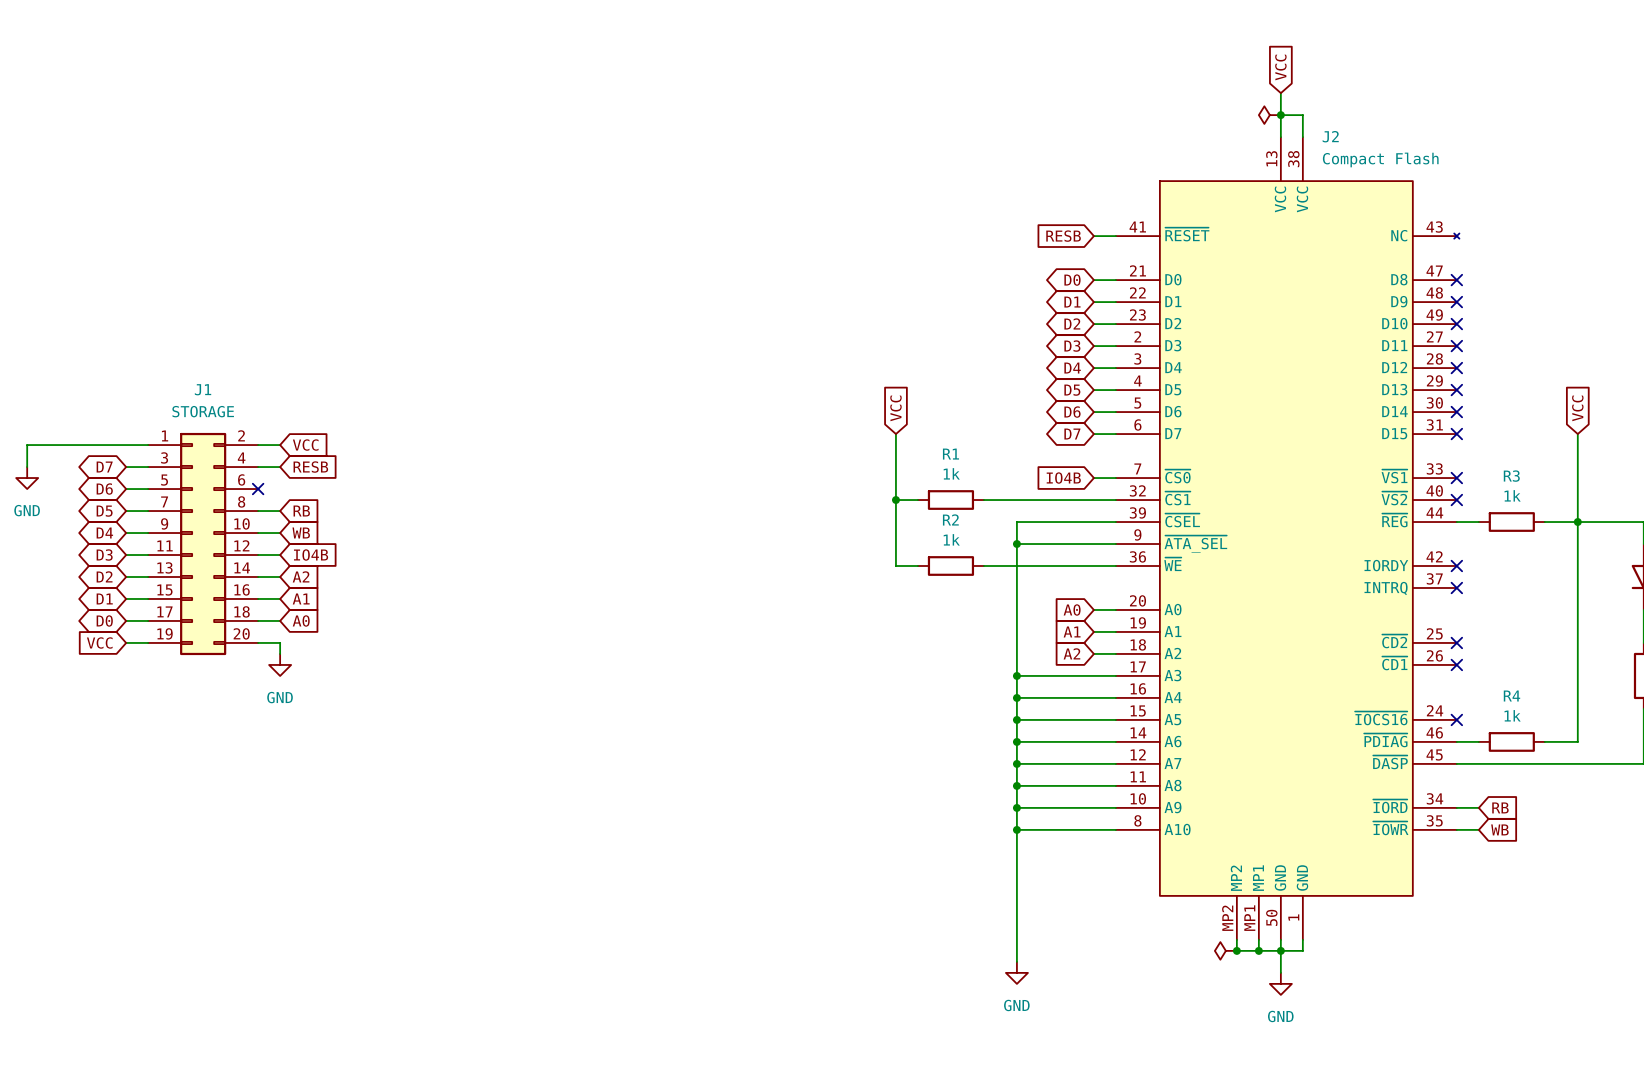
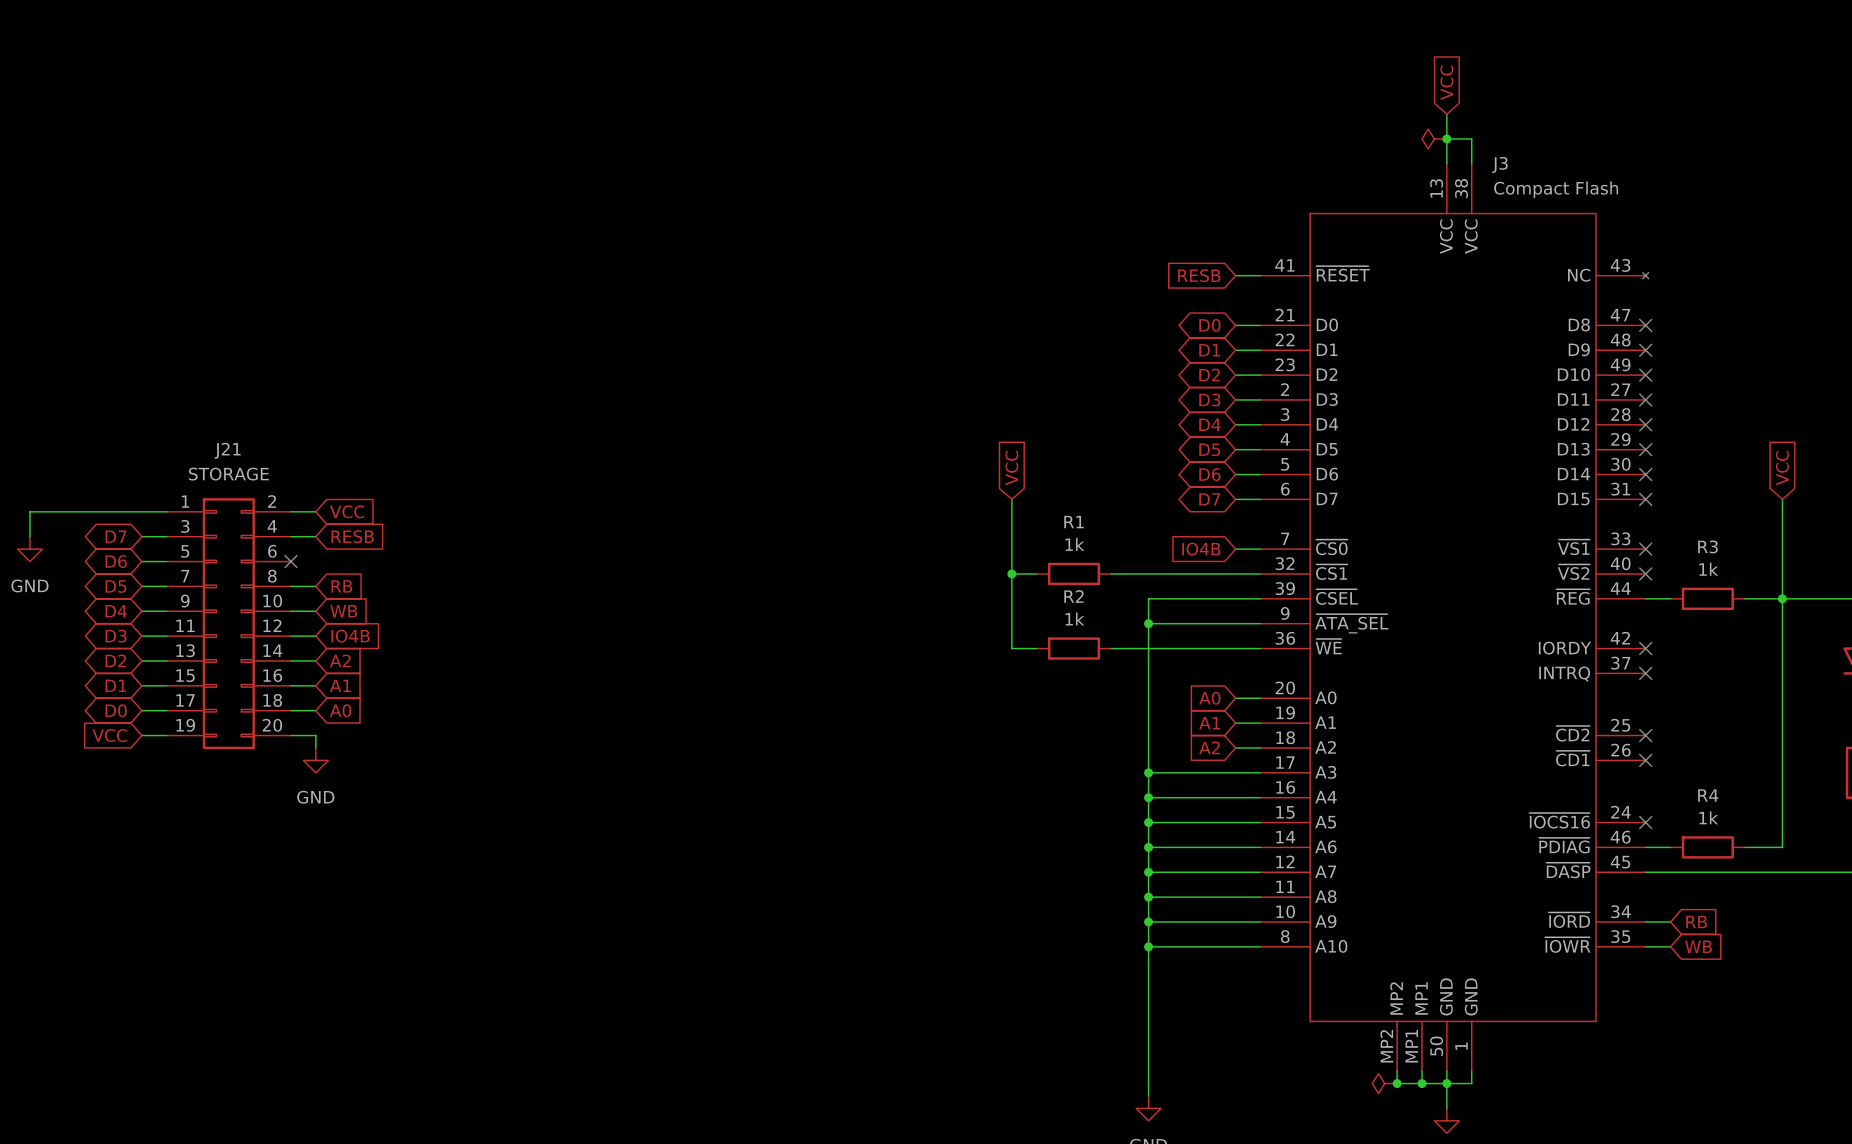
J2 name: J2 (1330, 136) -> J3 (1500, 164)
J1 name: J1 (203, 389) -> J21 (227, 450)

